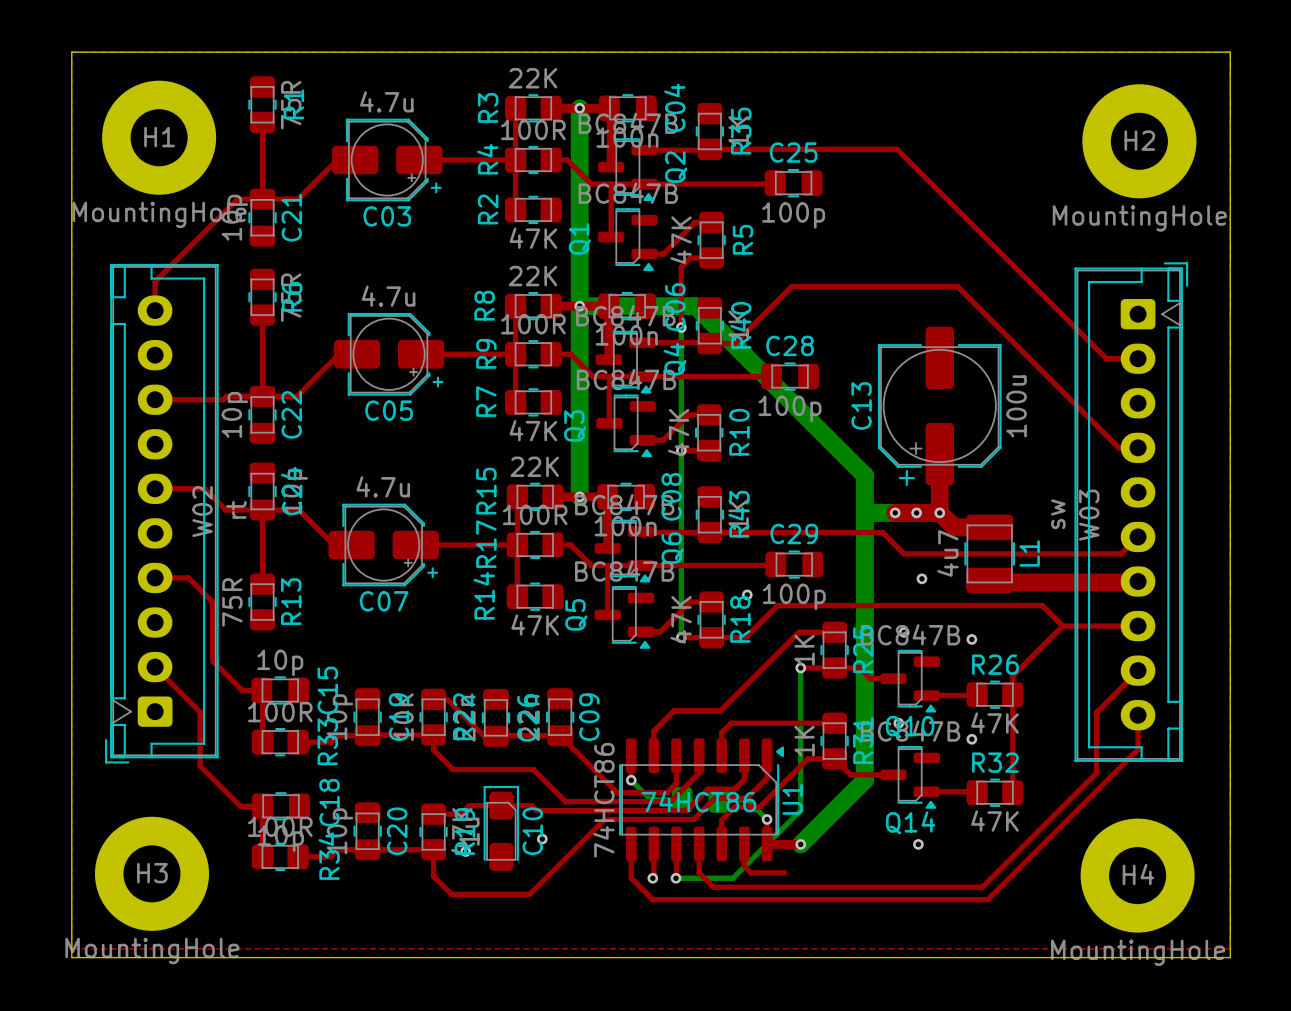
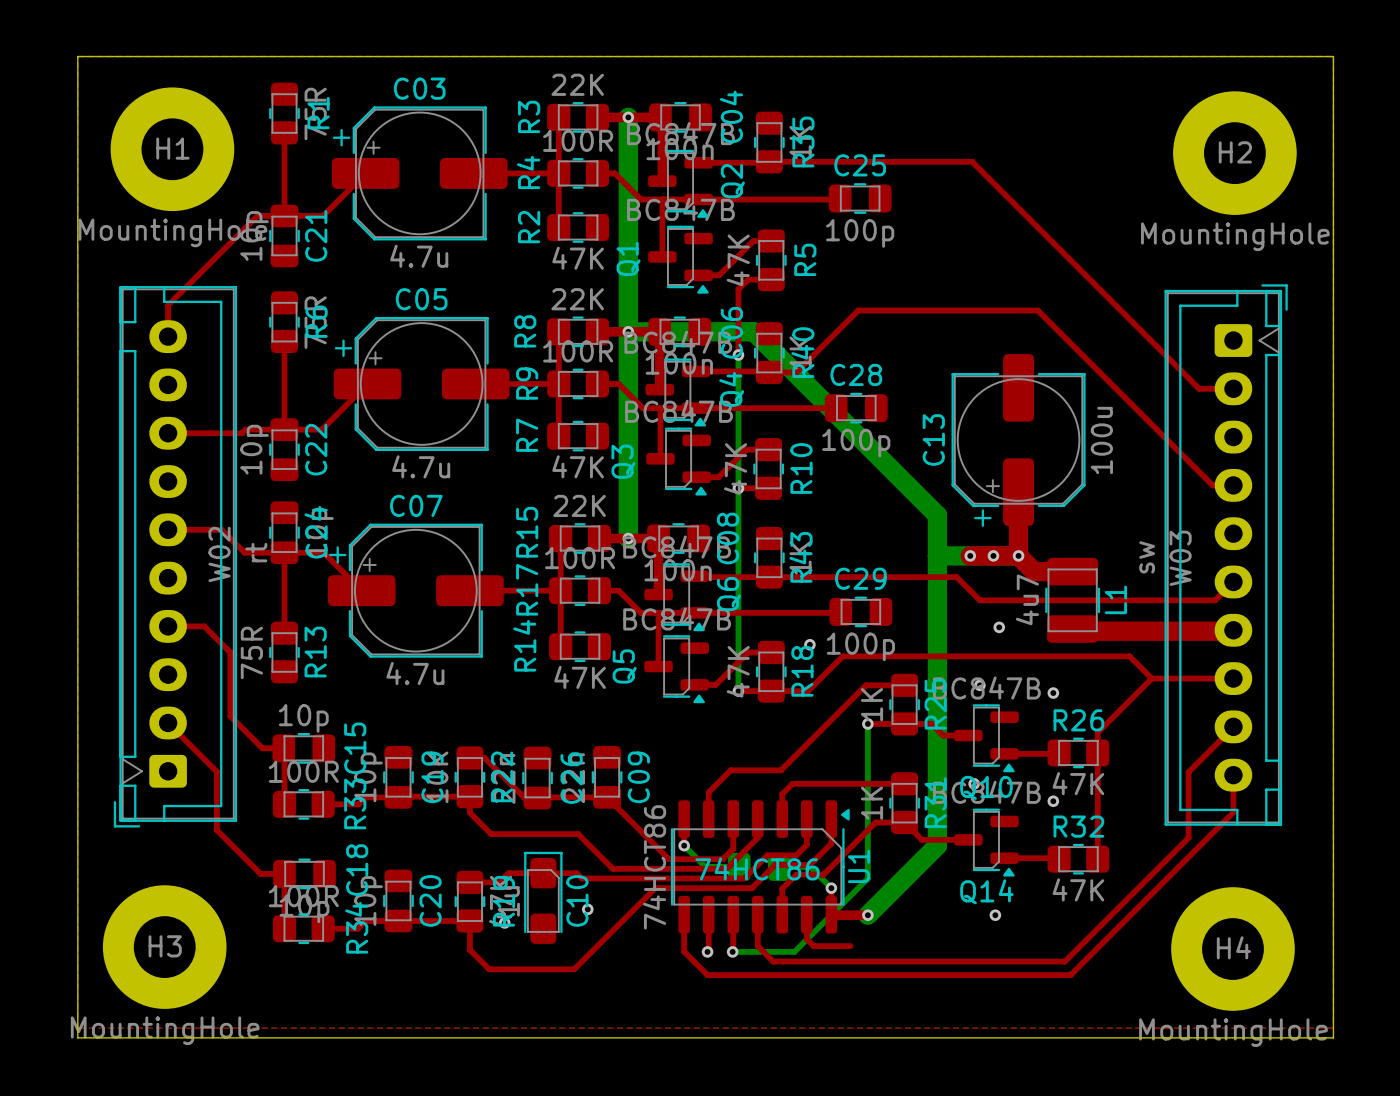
C03 value position: 4.7u (386, 101) -> 4.7u (419, 256)
C03 footprint: [331, 118, 443, 202] -> [331, 106, 508, 241]
C03 name position: C03 (387, 216) -> C03 (419, 88)
C05 value position: 4.7u (388, 296) -> 4.7u (421, 466)
C05 footprint: [333, 312, 445, 396] -> [333, 316, 510, 452]
C05 name position: C05 (389, 410) -> C05 (421, 299)
C07 value position: 4.7u (383, 486) -> 4.7u (415, 673)
C07 footprint: [328, 503, 439, 587] -> [327, 523, 504, 658]
C07 name position: C07 (384, 601) -> C07 (416, 505)

